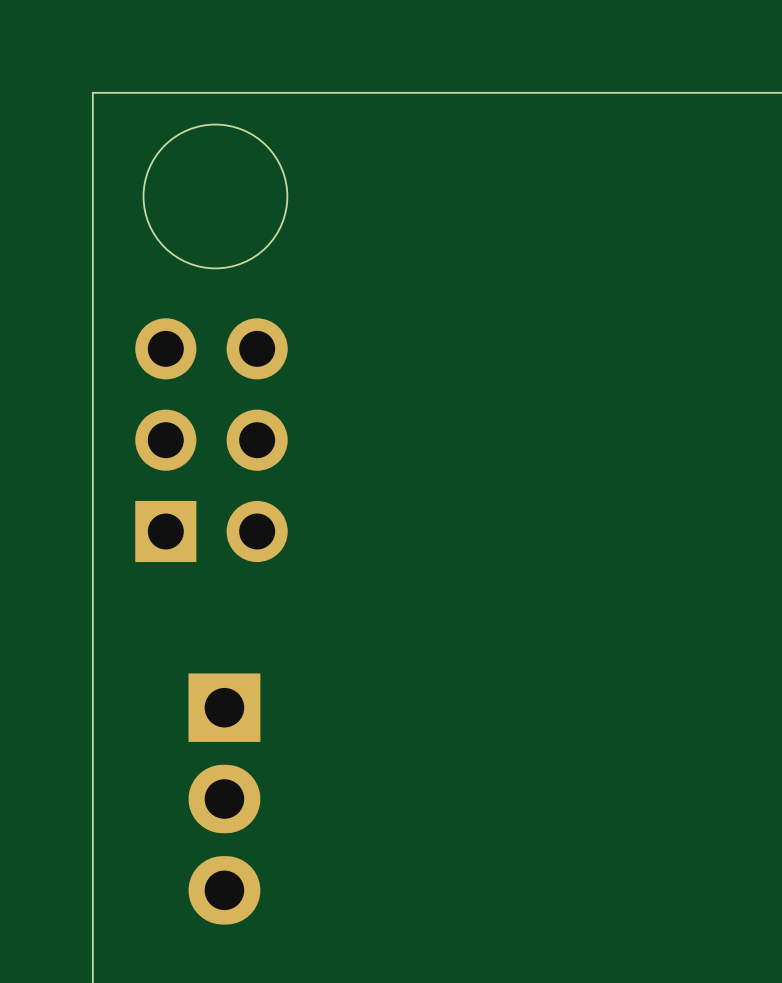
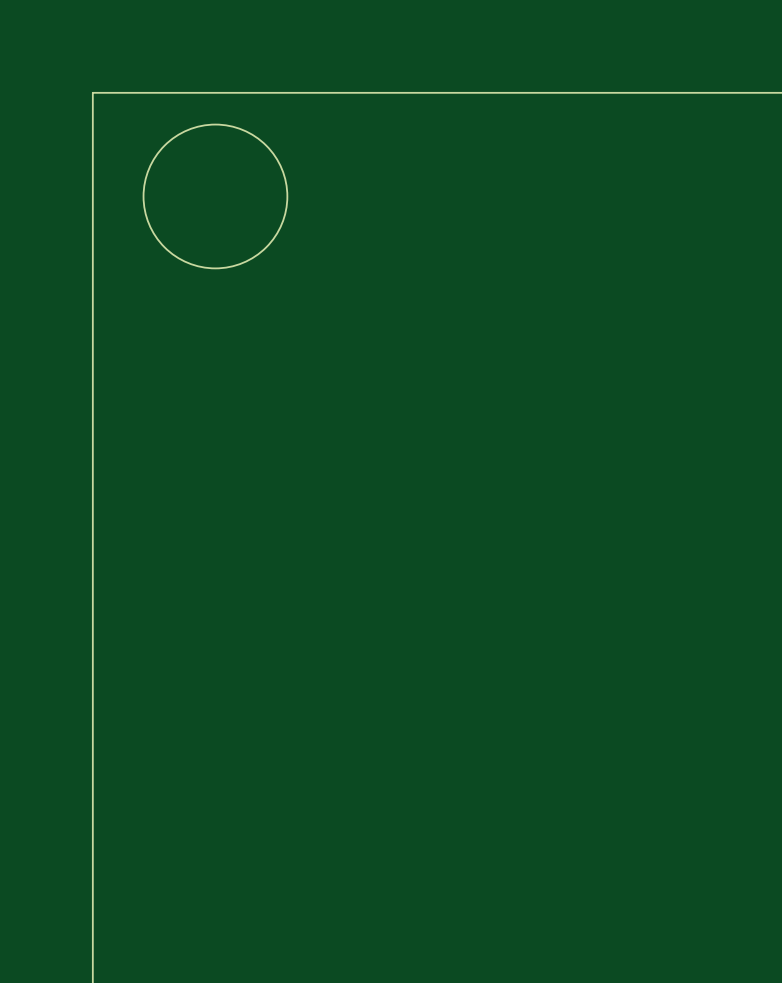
part: (211, 440) -> none
part: (224, 799) -> none

